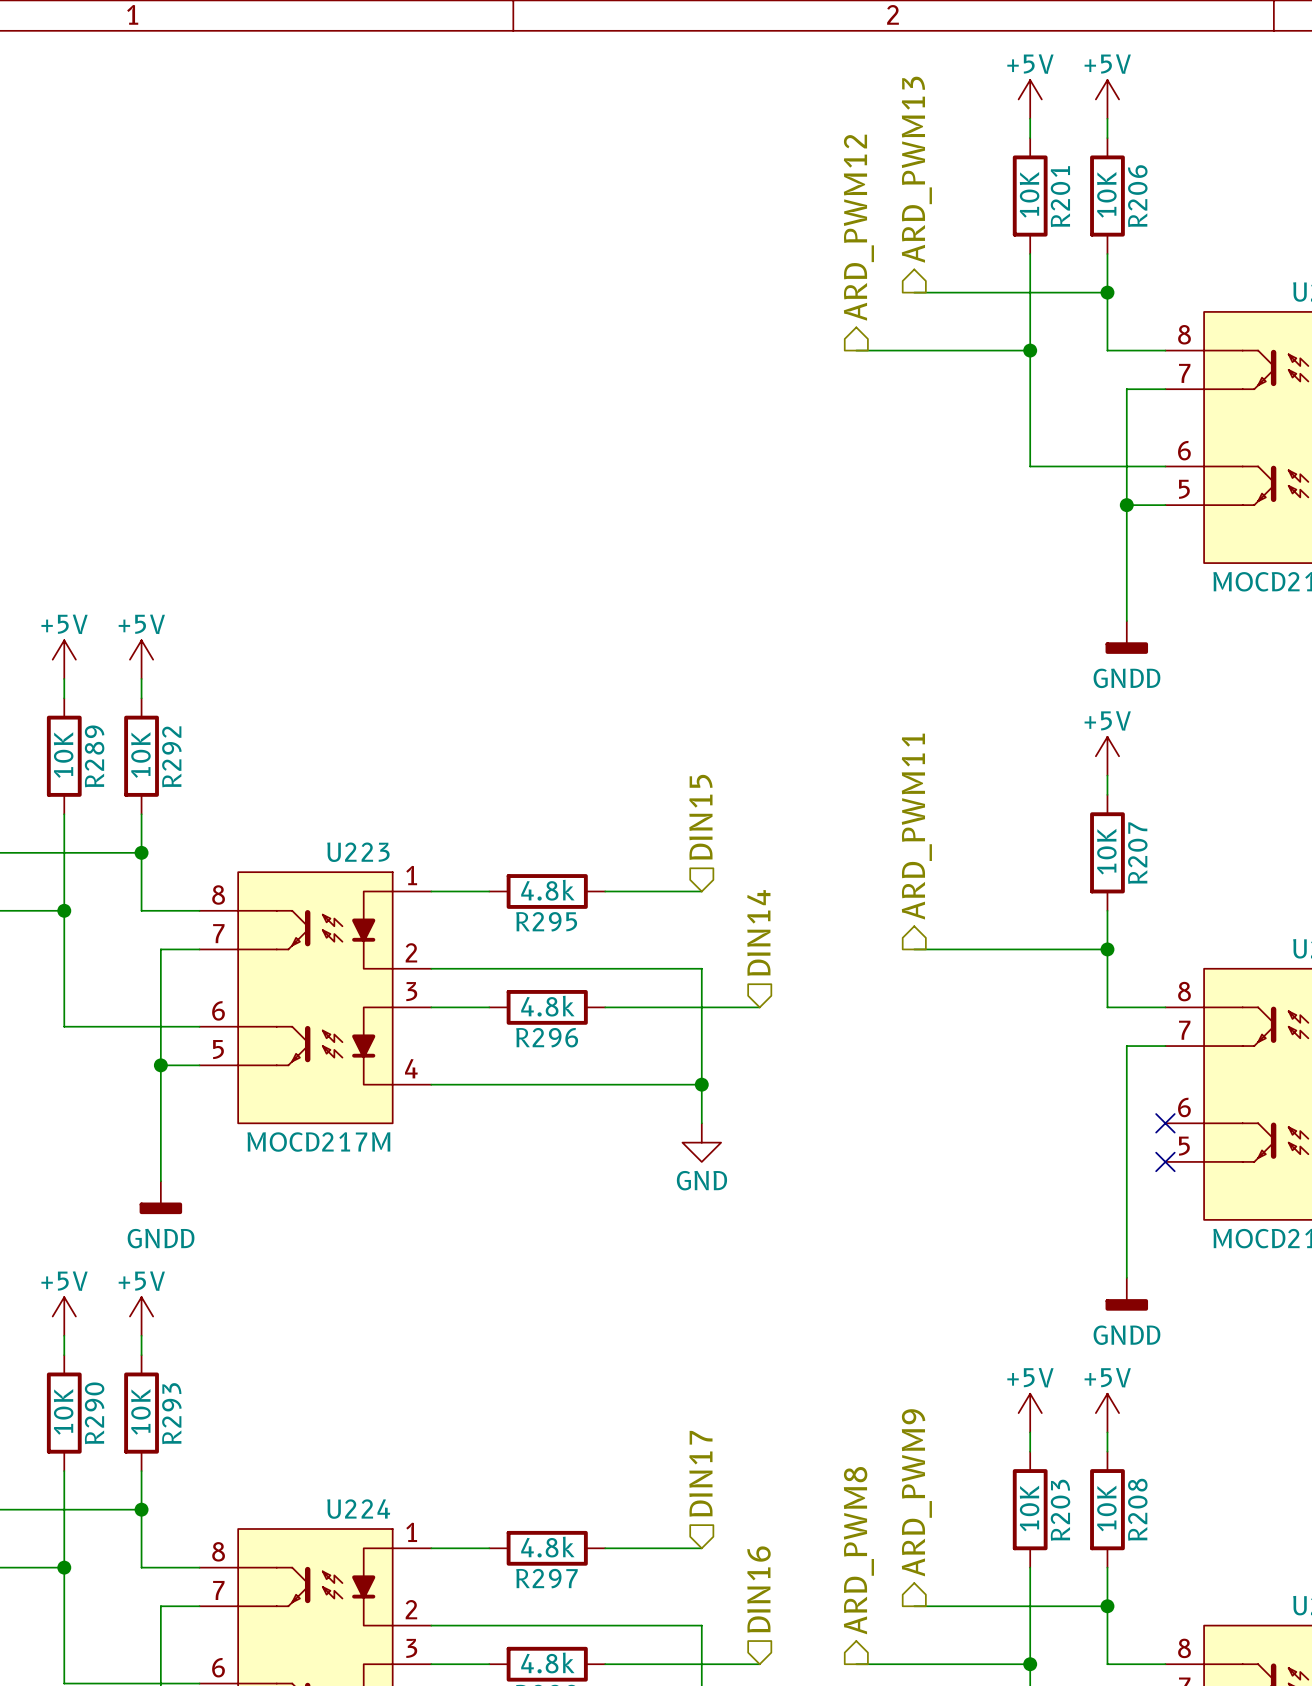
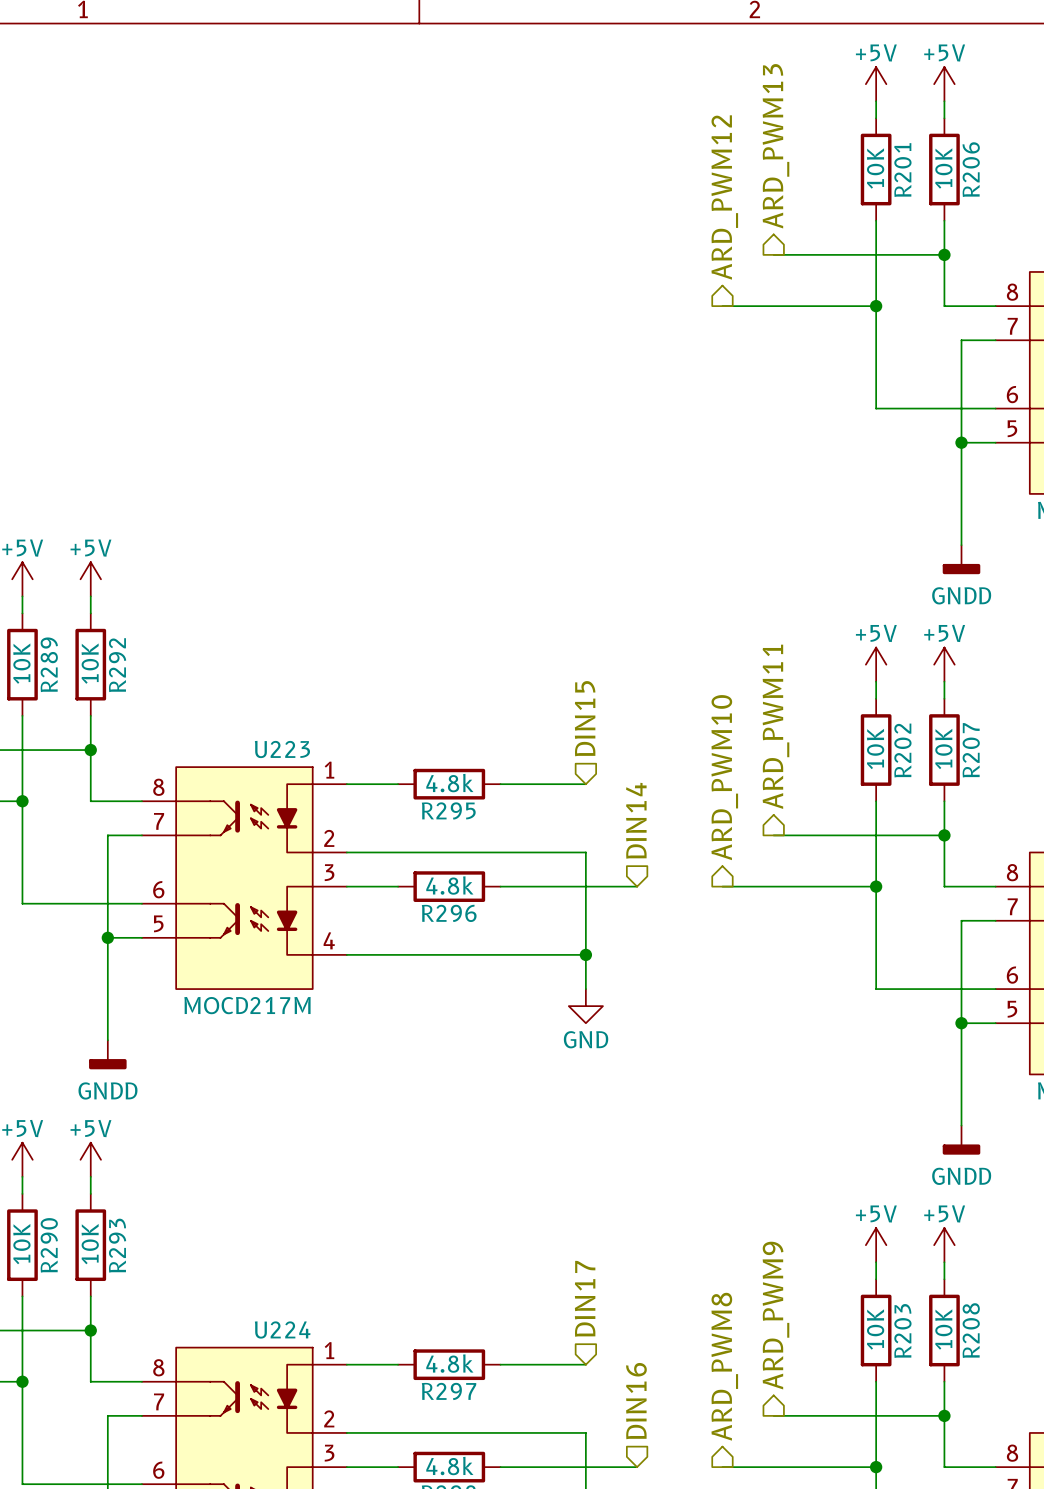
power symbol: none -> +5V (876, 664)
wire: none -> (876, 681) (876, 698)
R202: none -> 10K (876, 750)
hierarchical label: none -> ARD_PWM10 (724, 777)
wire: none -> (876, 801) (876, 989) (995, 989)
wire: none -> (722, 886) (876, 886)
junction: none -> (876, 886)
no-connect mark: (1165, 1123) -> none
wire: none -> (961, 1023) (995, 1023)
junction: none -> (961, 1023)
no-connect mark: (1165, 1161) -> none

